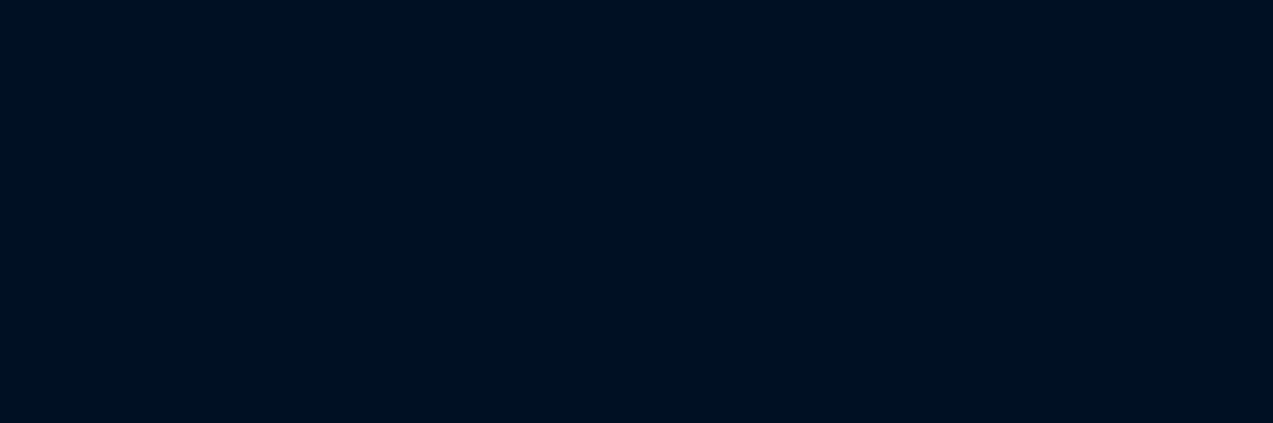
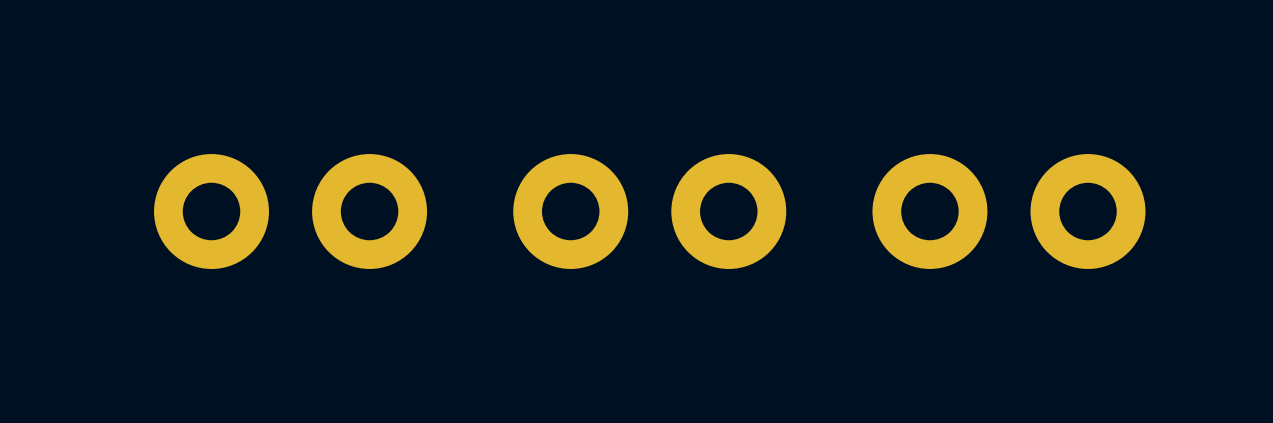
part: none -> (290, 211)
part: none -> (649, 211)
part: none -> (1008, 211)

